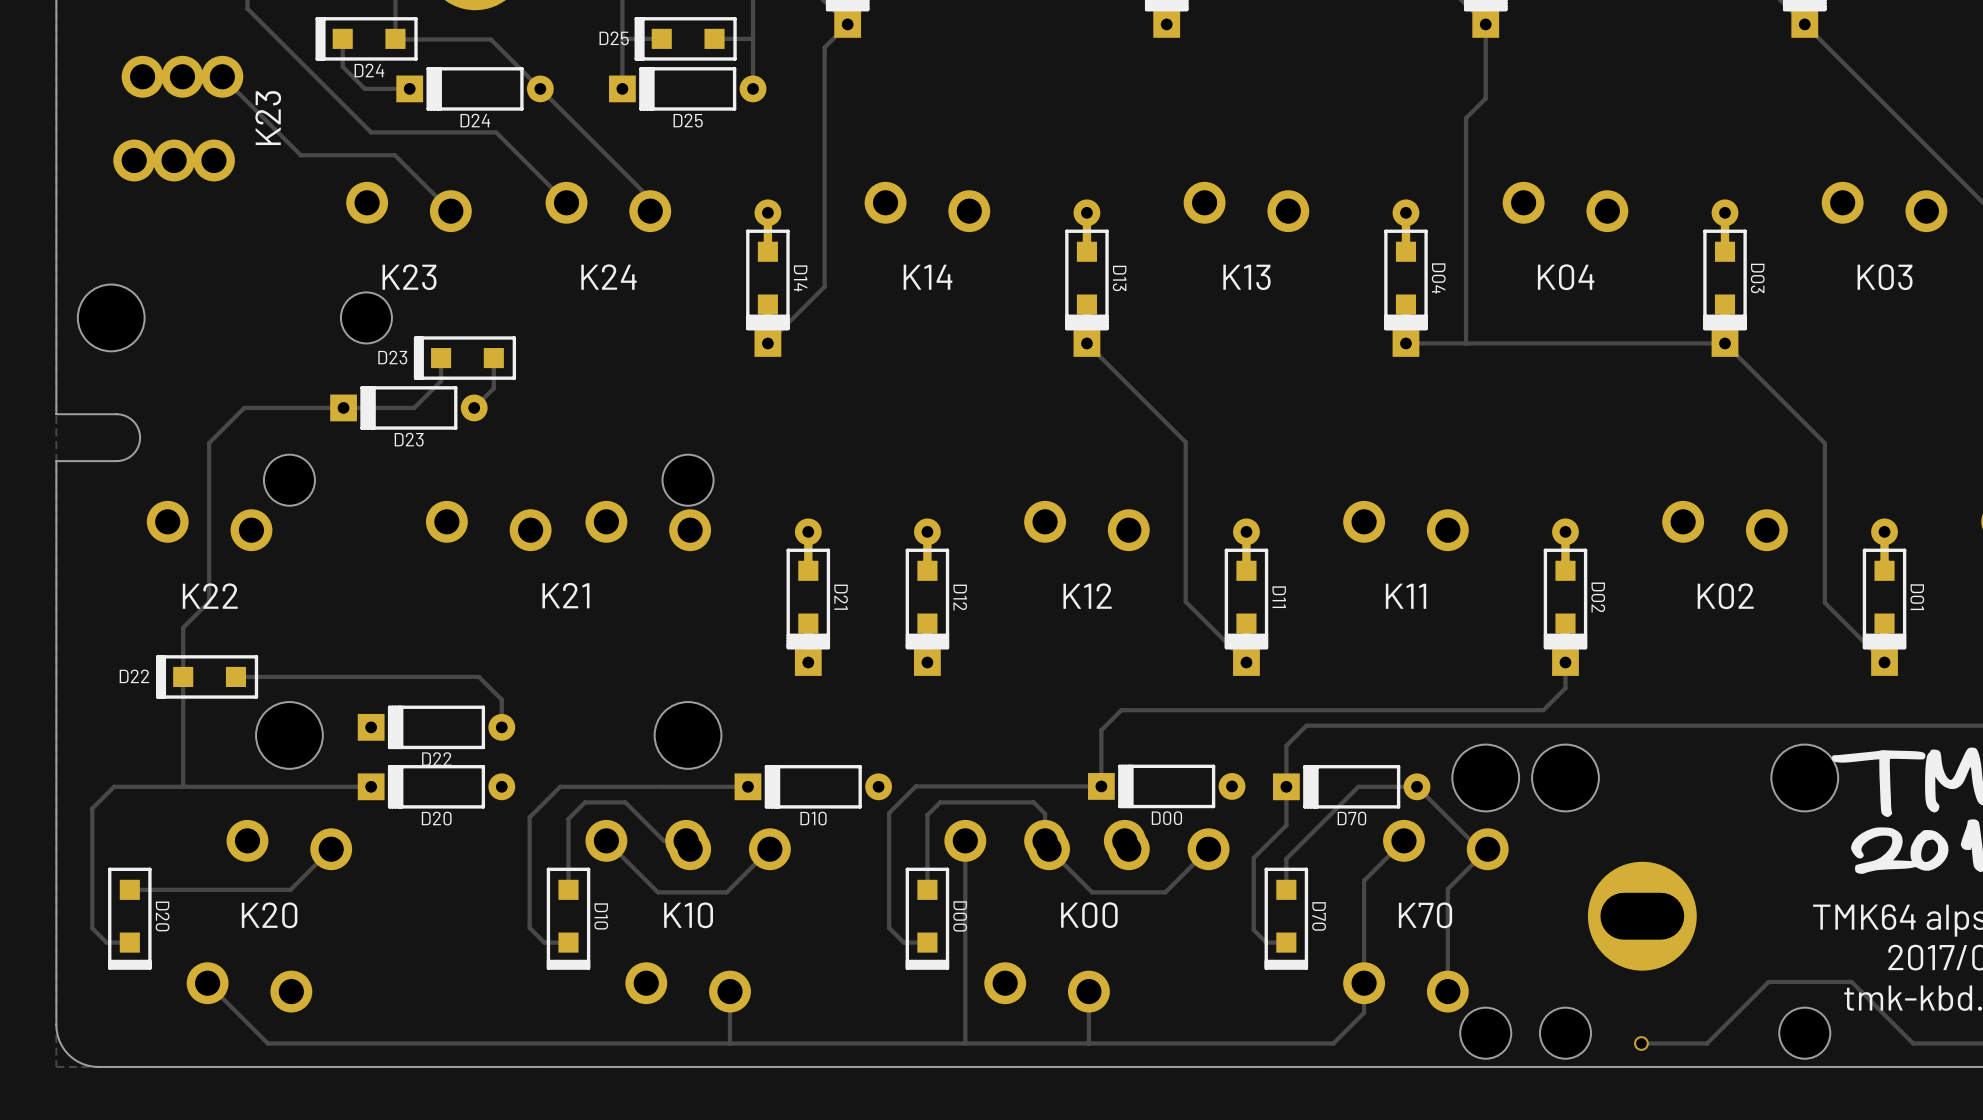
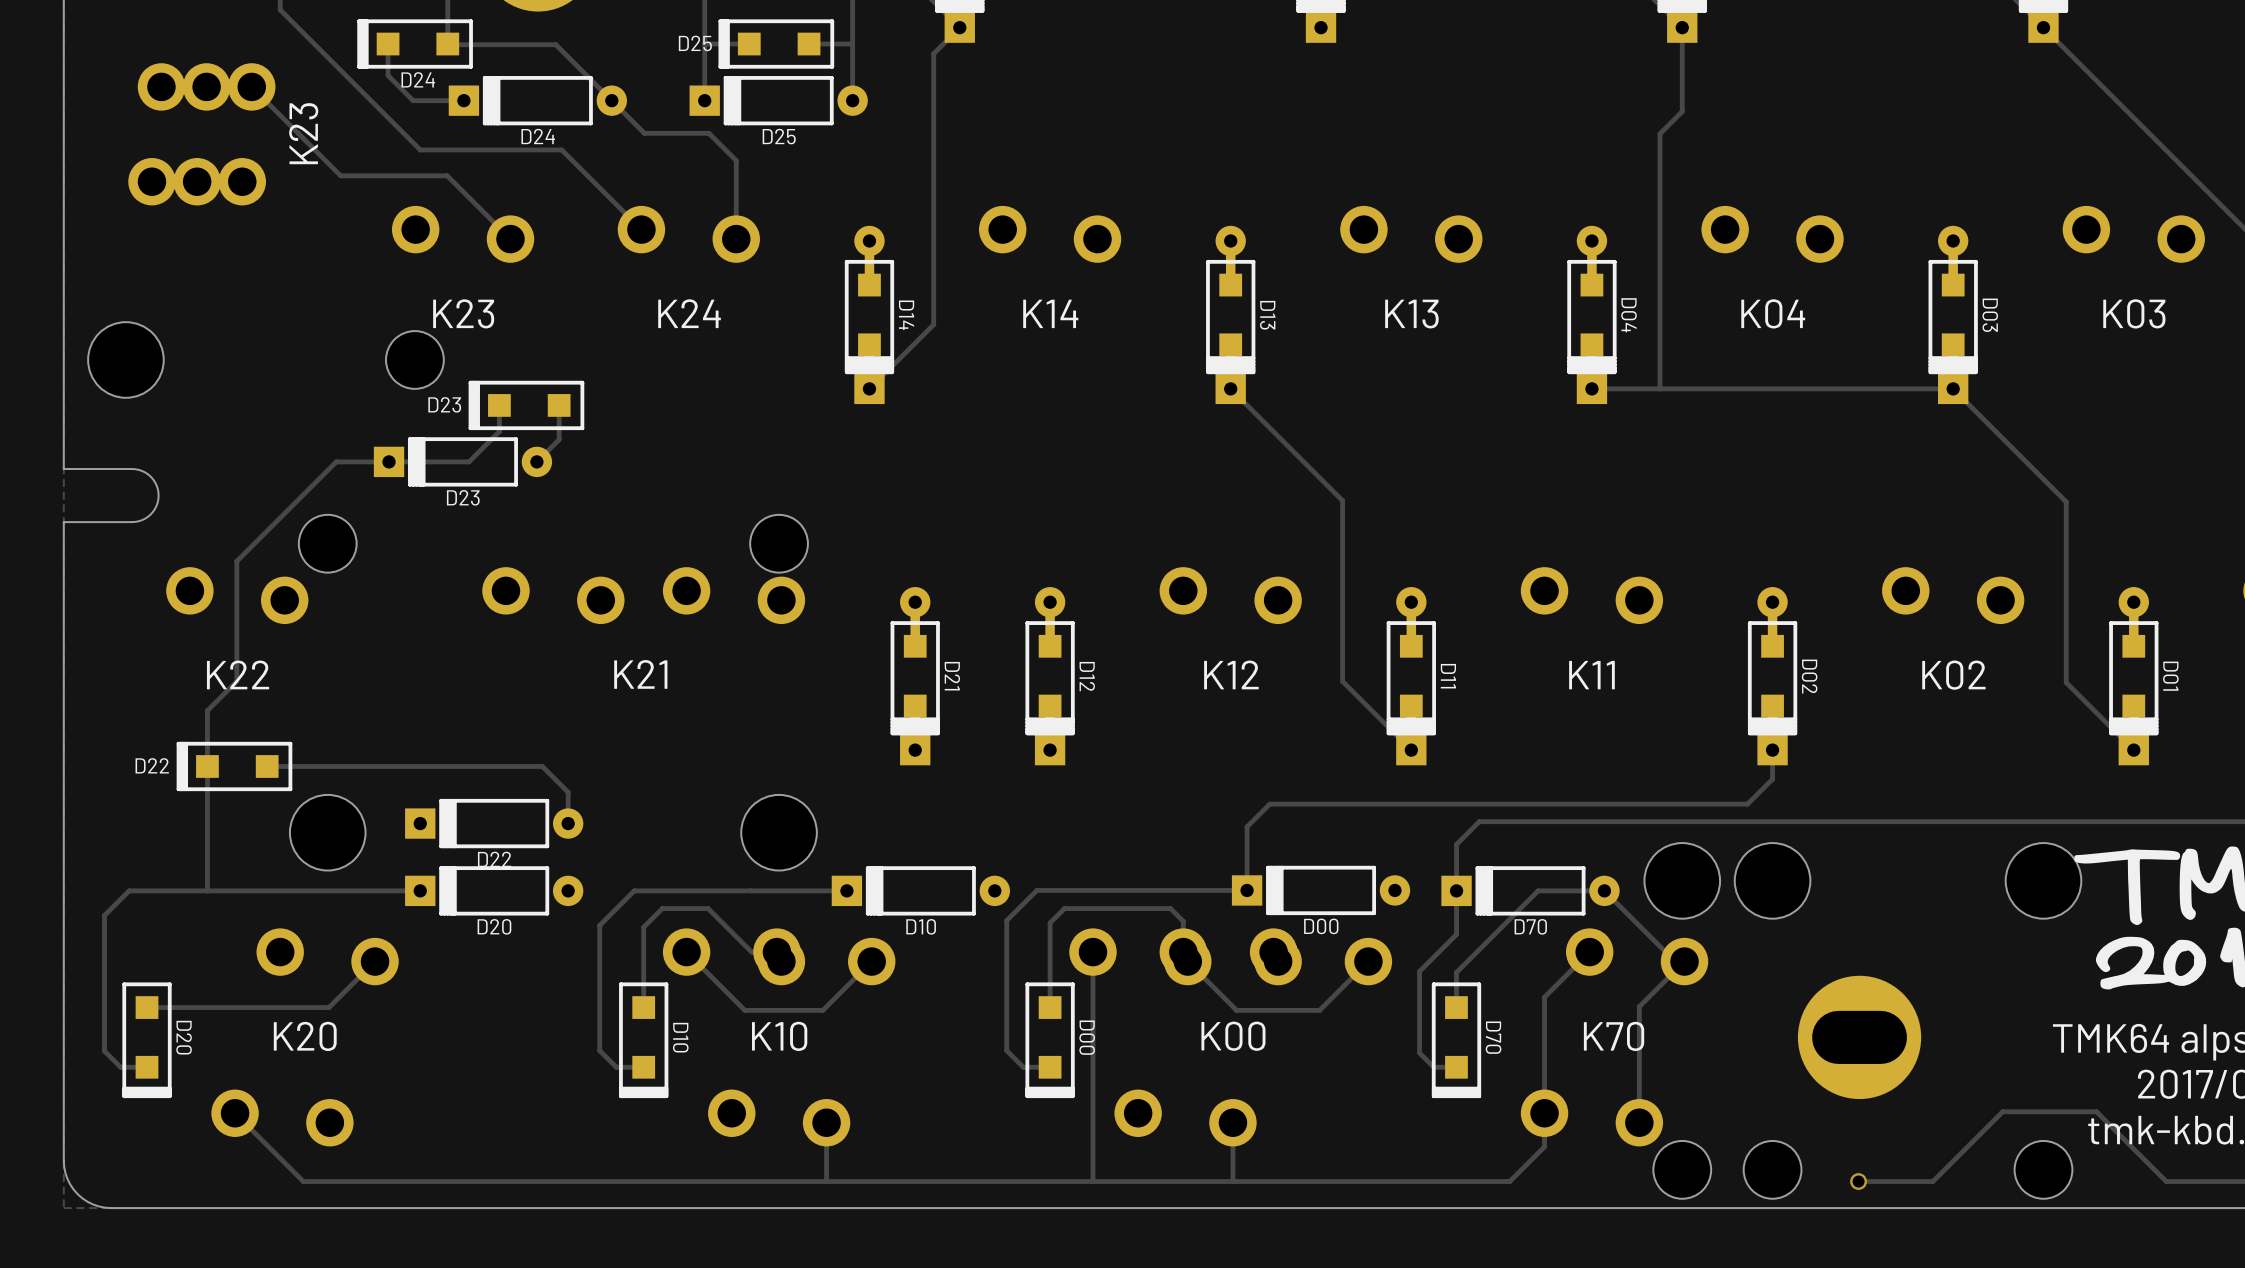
track: (569, 117) (650, 198) -> (644, 133) (708, 133) (736, 160) (736, 225)
track: (297, 407) (244, 407) (209, 443) (209, 495) -> (336, 461) (236, 561)

